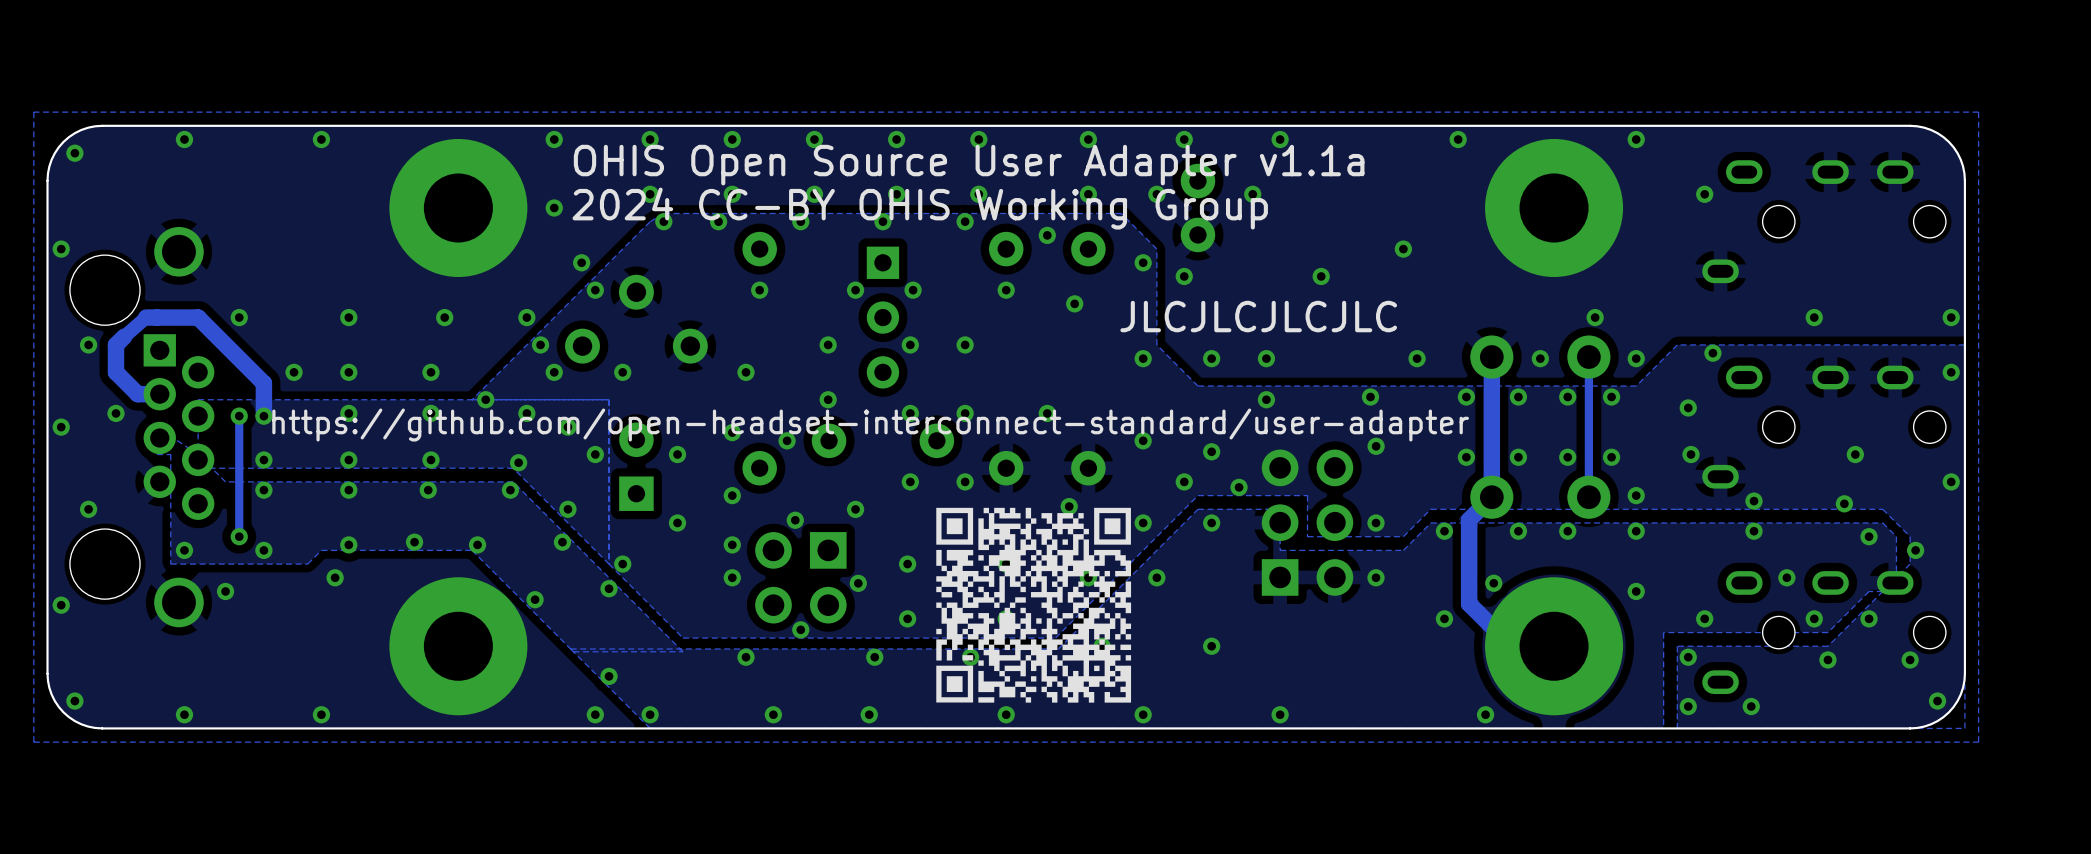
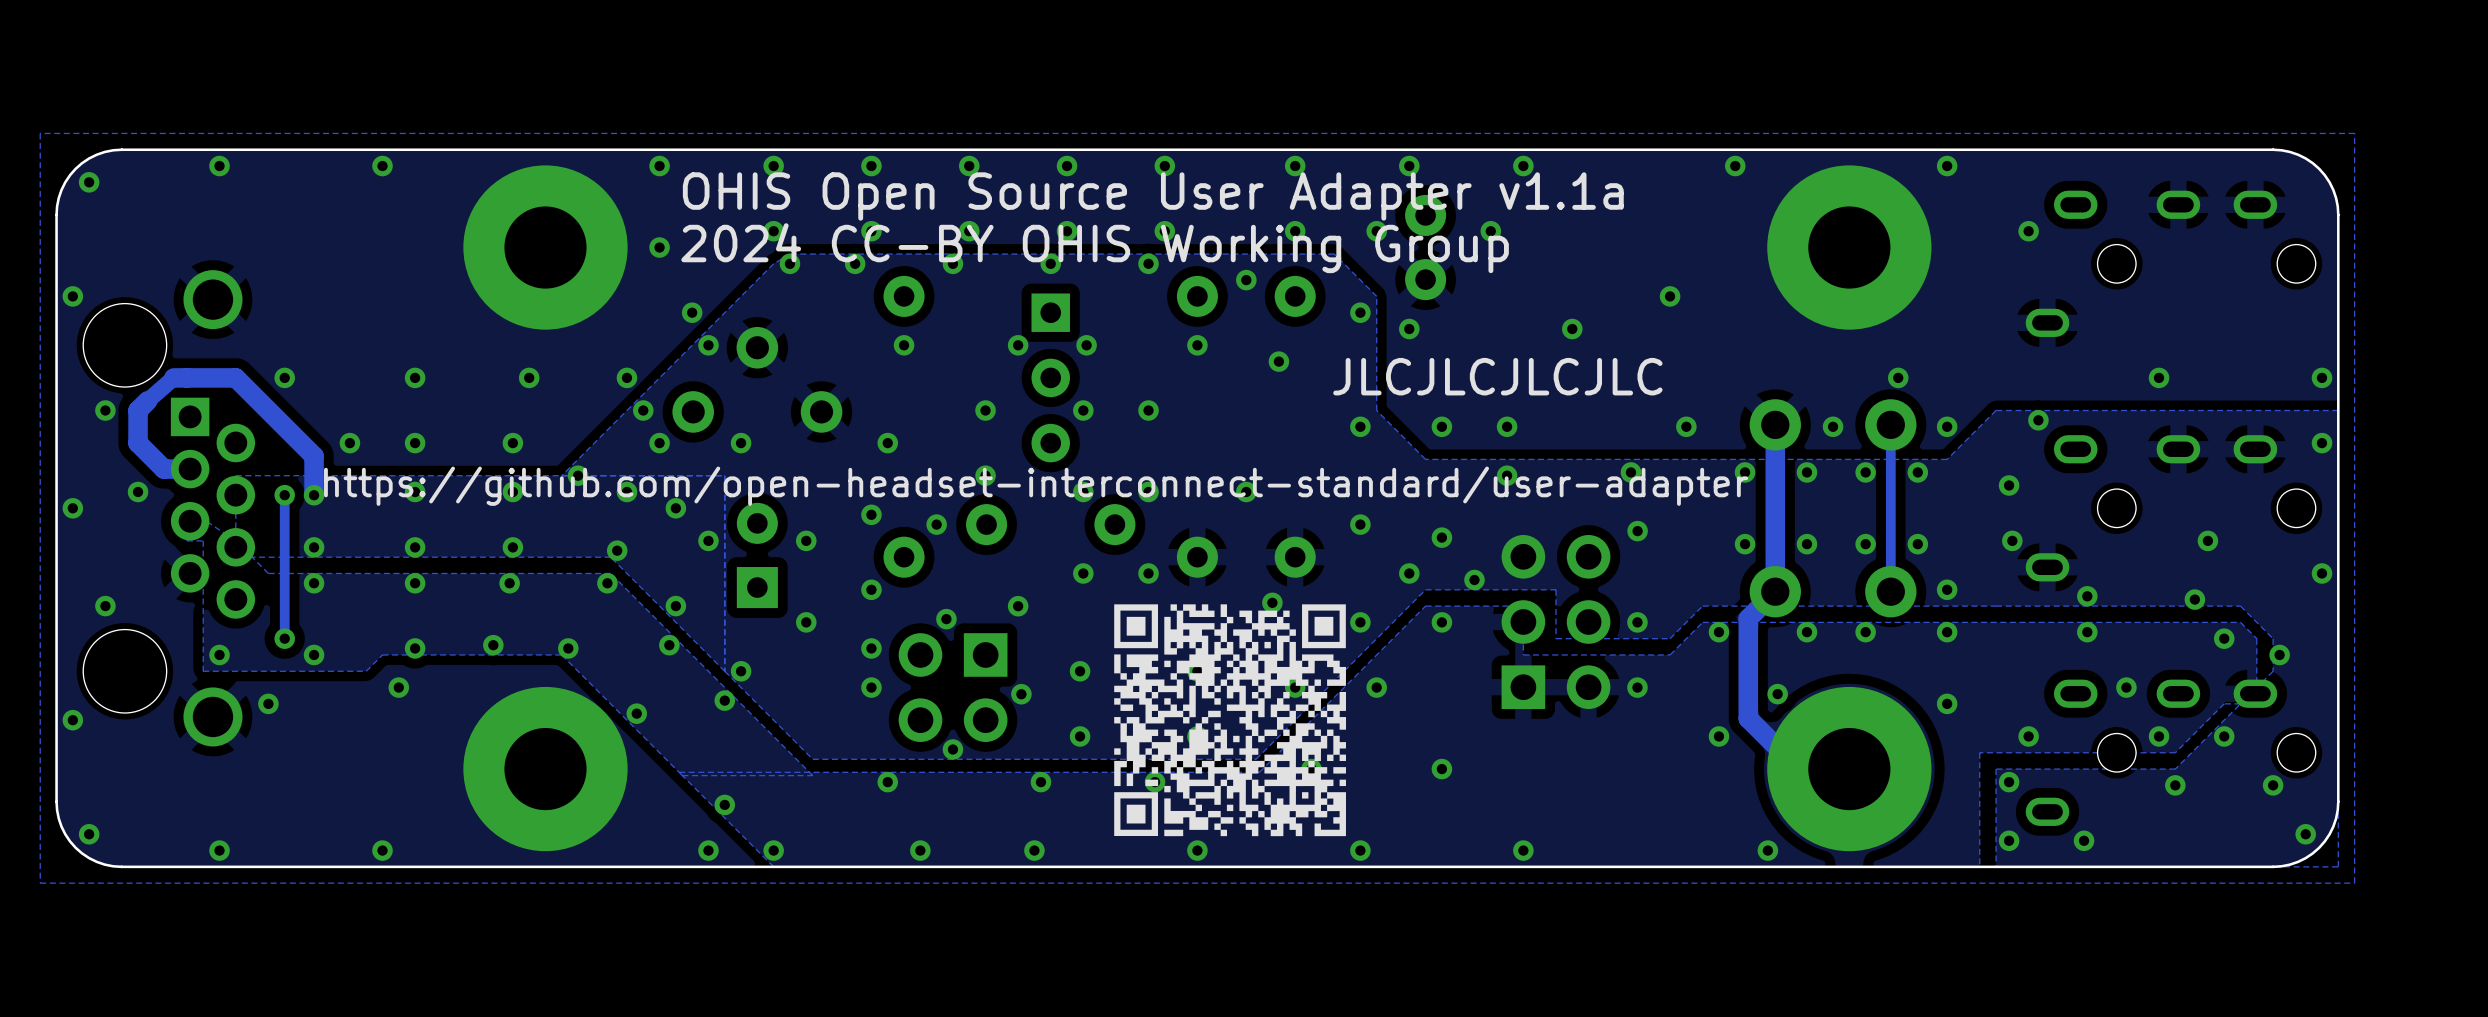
text position: https://github.com/open-headset-interconnect-standard/user-adapter (870, 425) -> https://github.com/open-headset-interconnect-standard/user-adapter (1036, 486)

